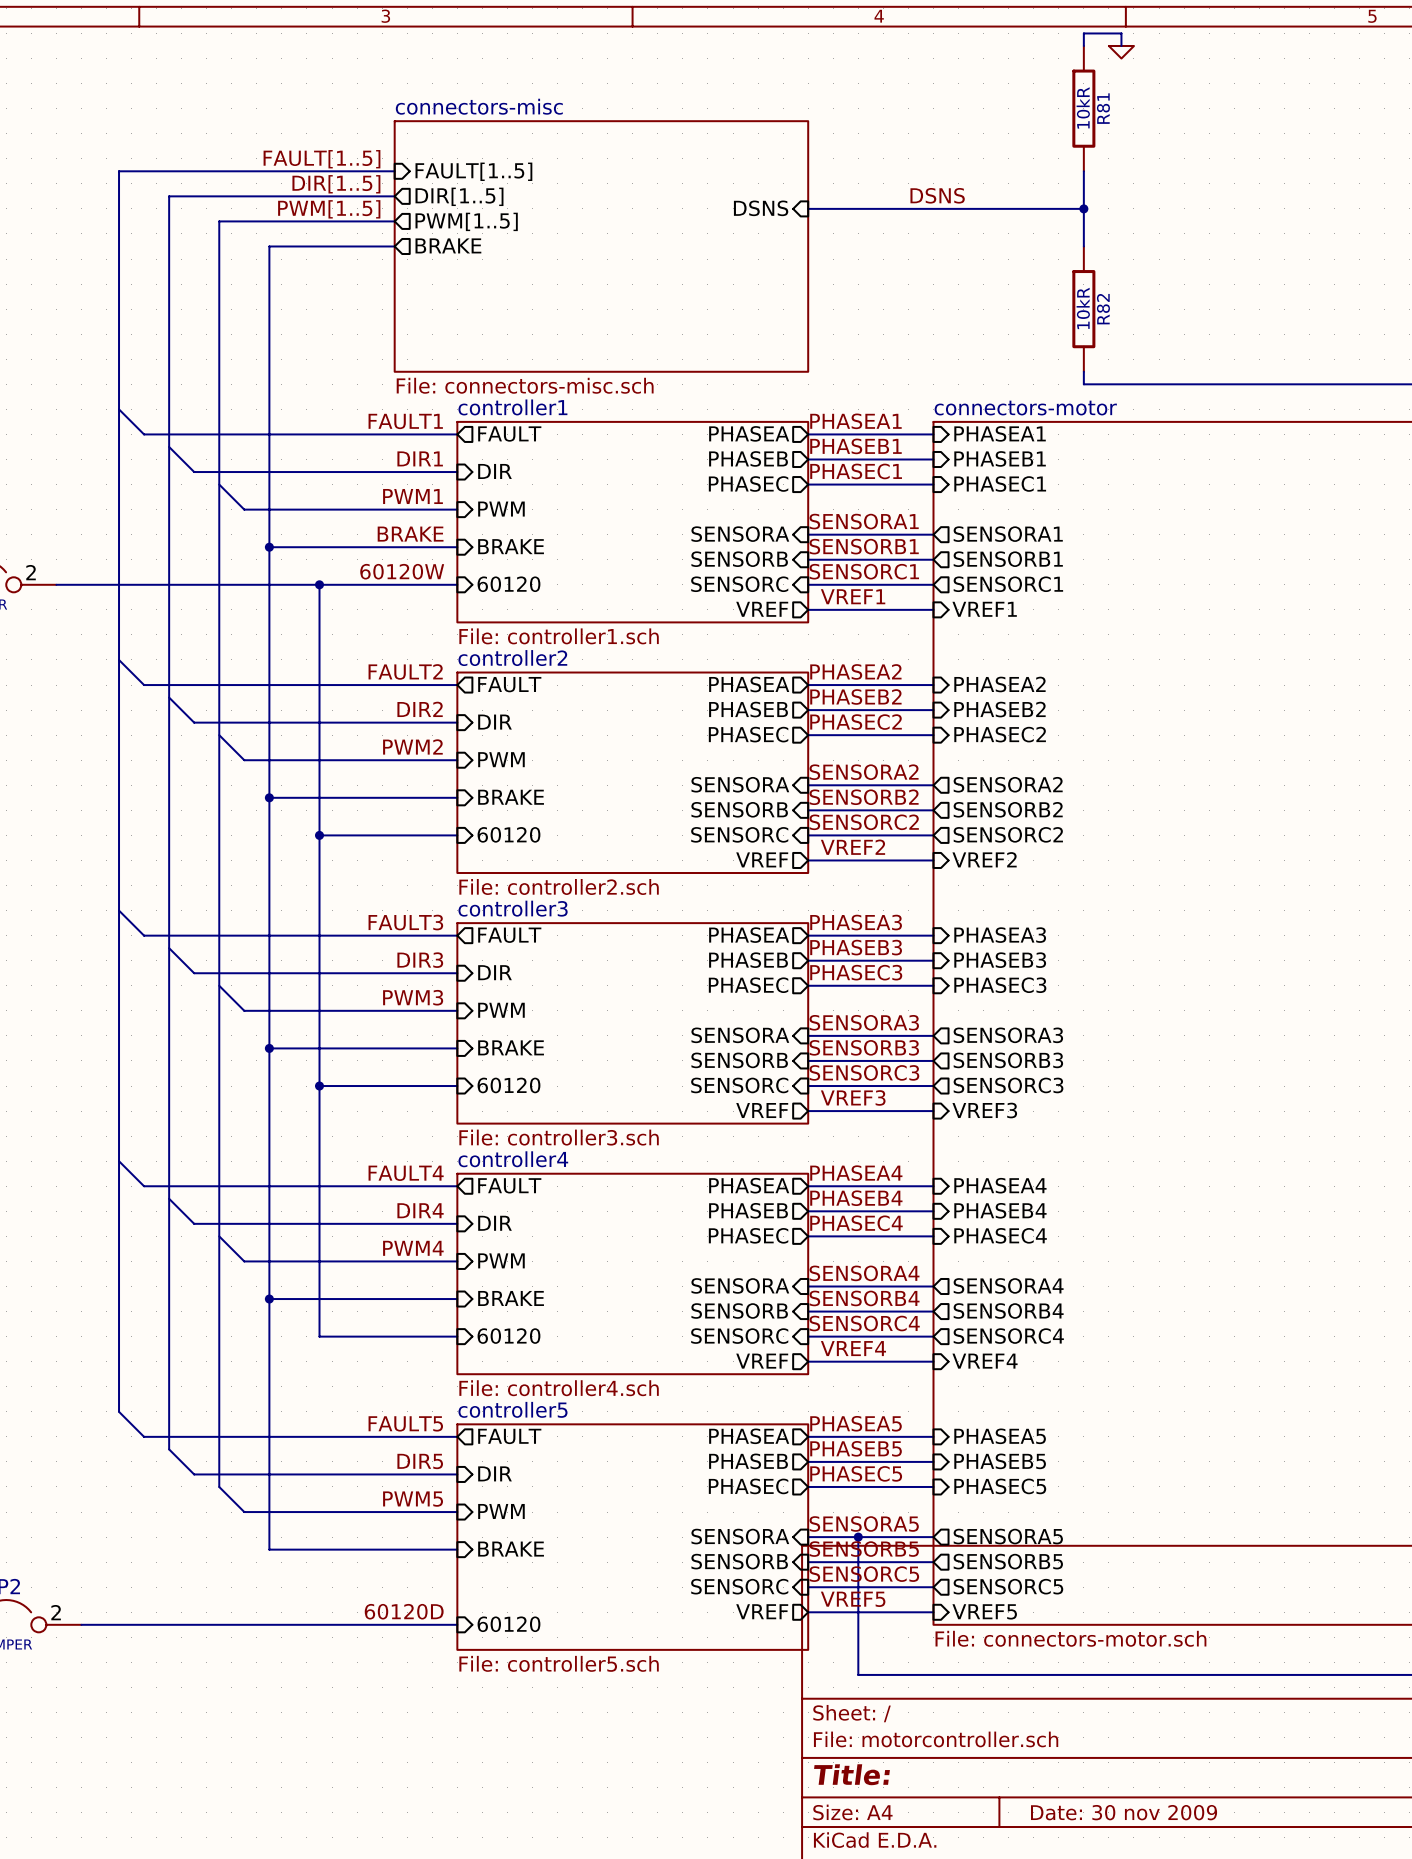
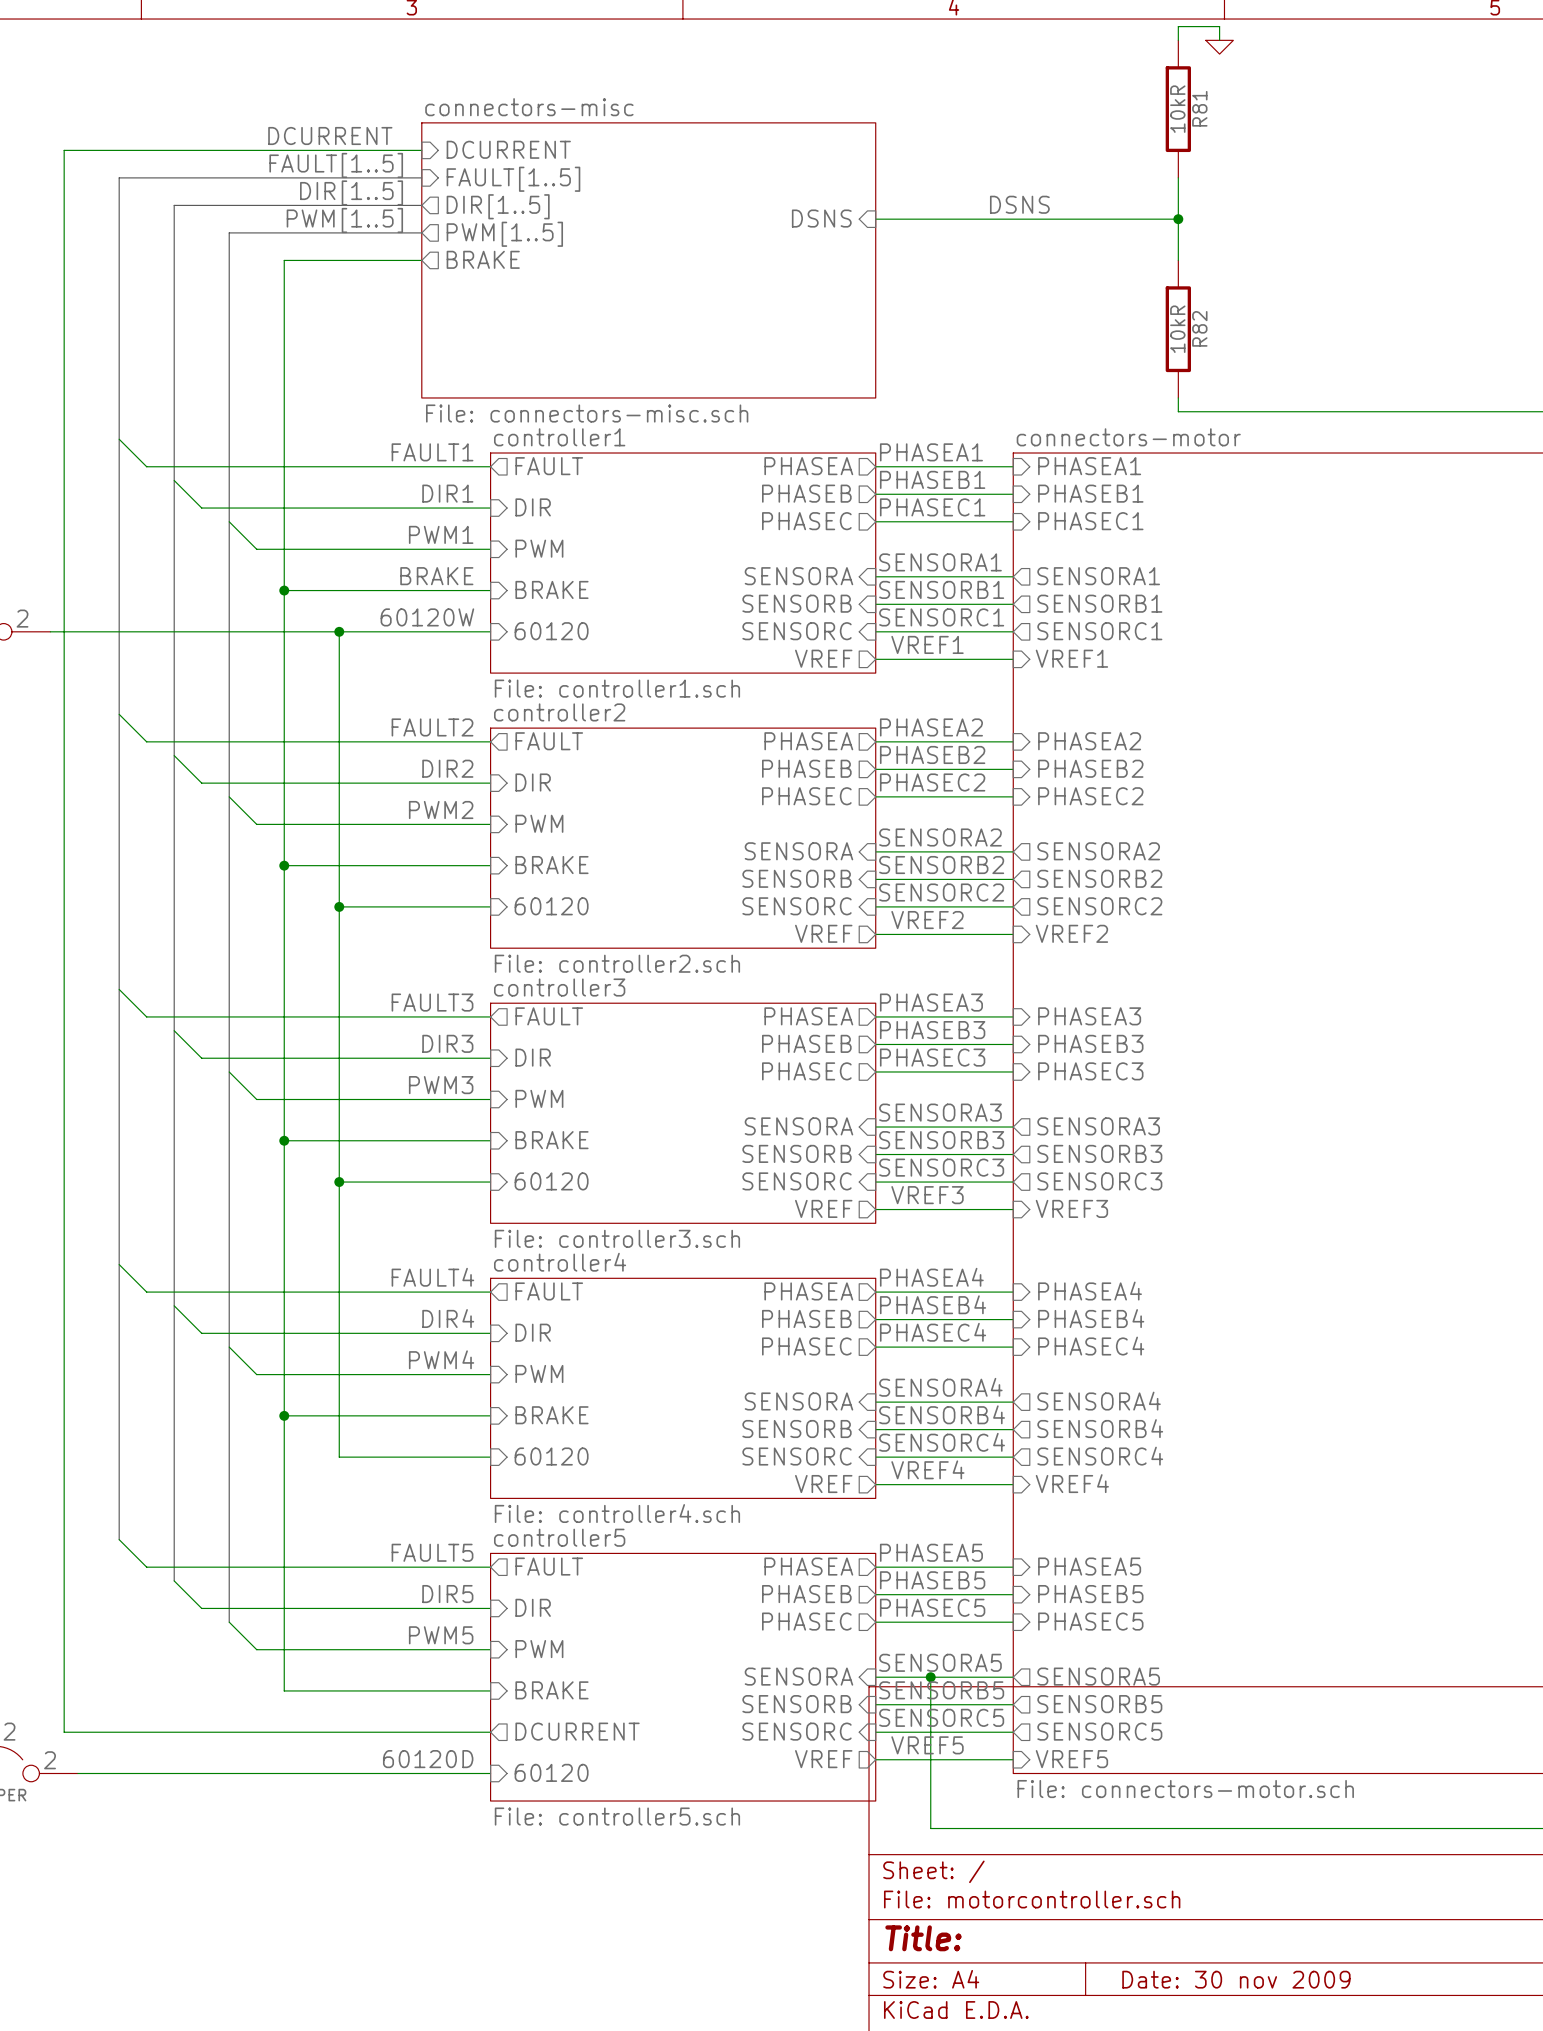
label: none -> DCURRENT (330, 135)
sheet pin: none -> DCURRENT (508, 149)
wire: none -> (421, 150) (64, 150) (64, 1732) (490, 1732)
sheet pin: none -> DCURRENT (577, 1731)

